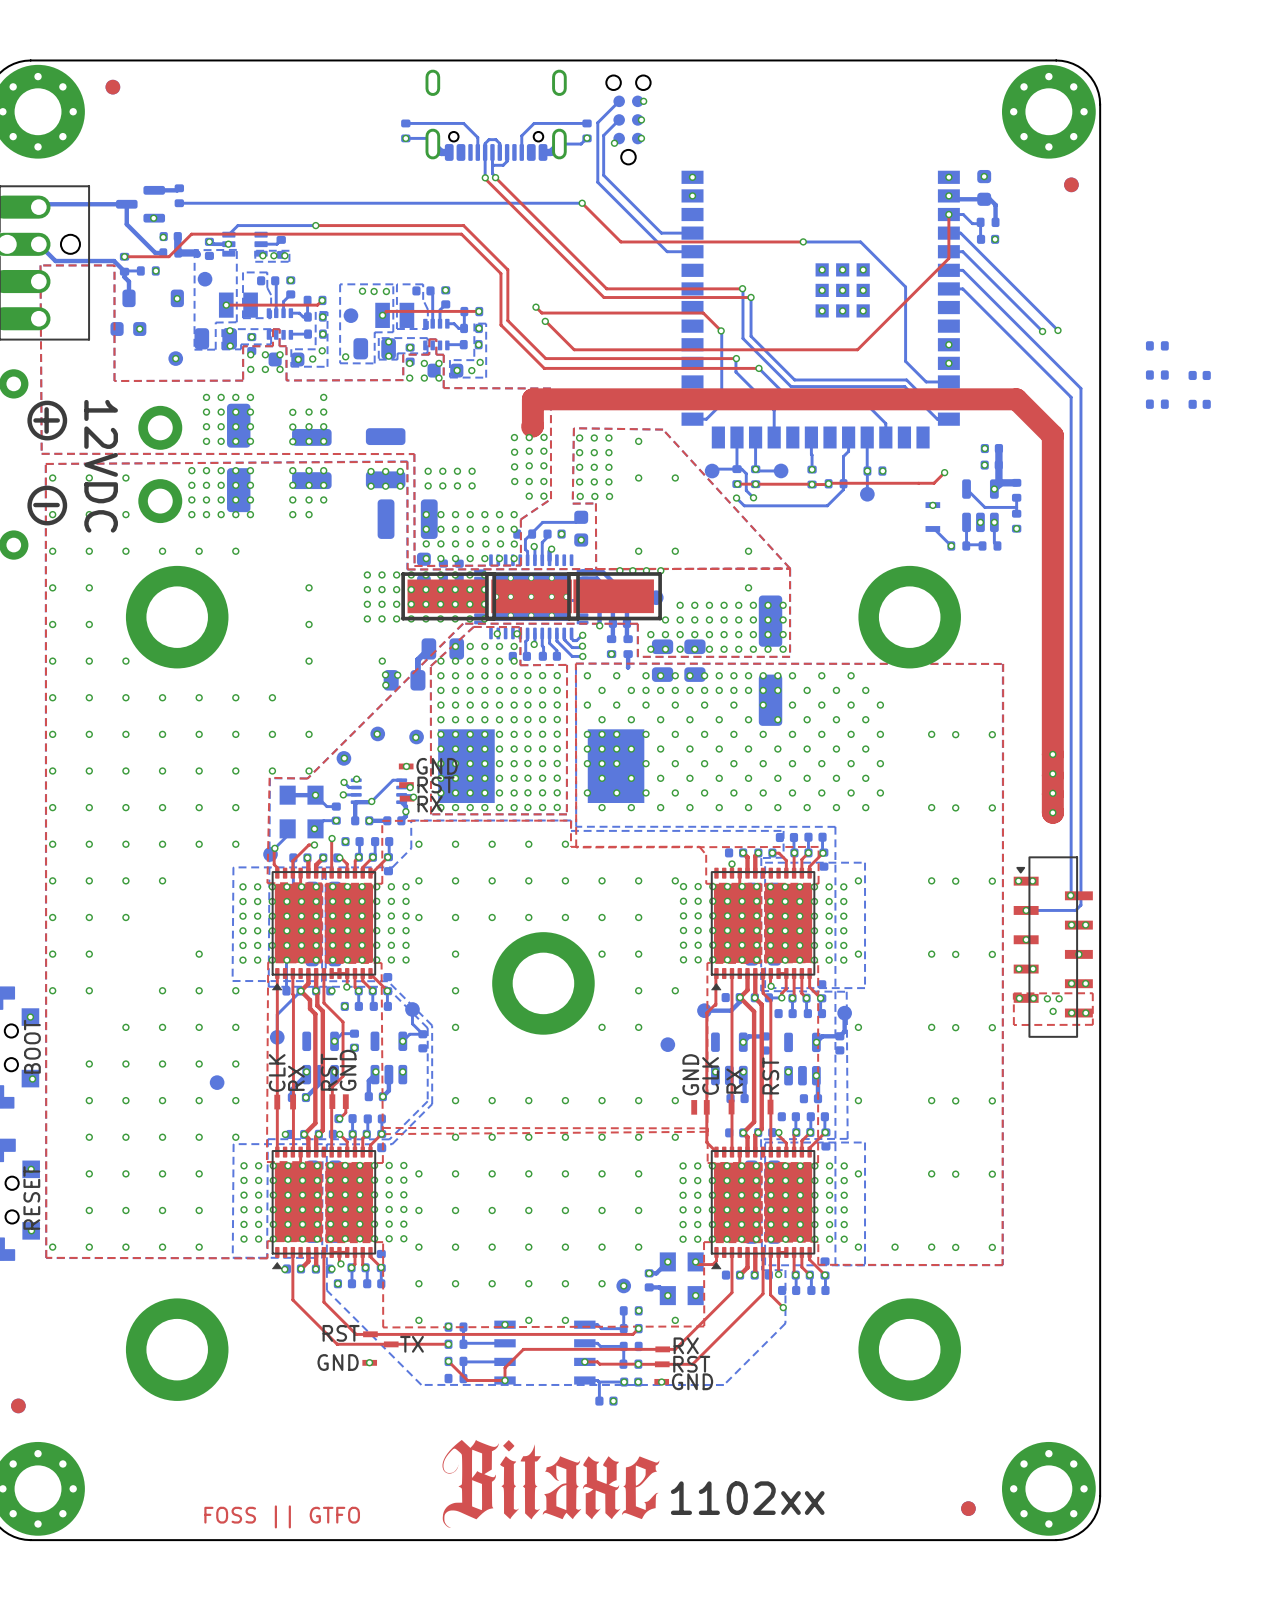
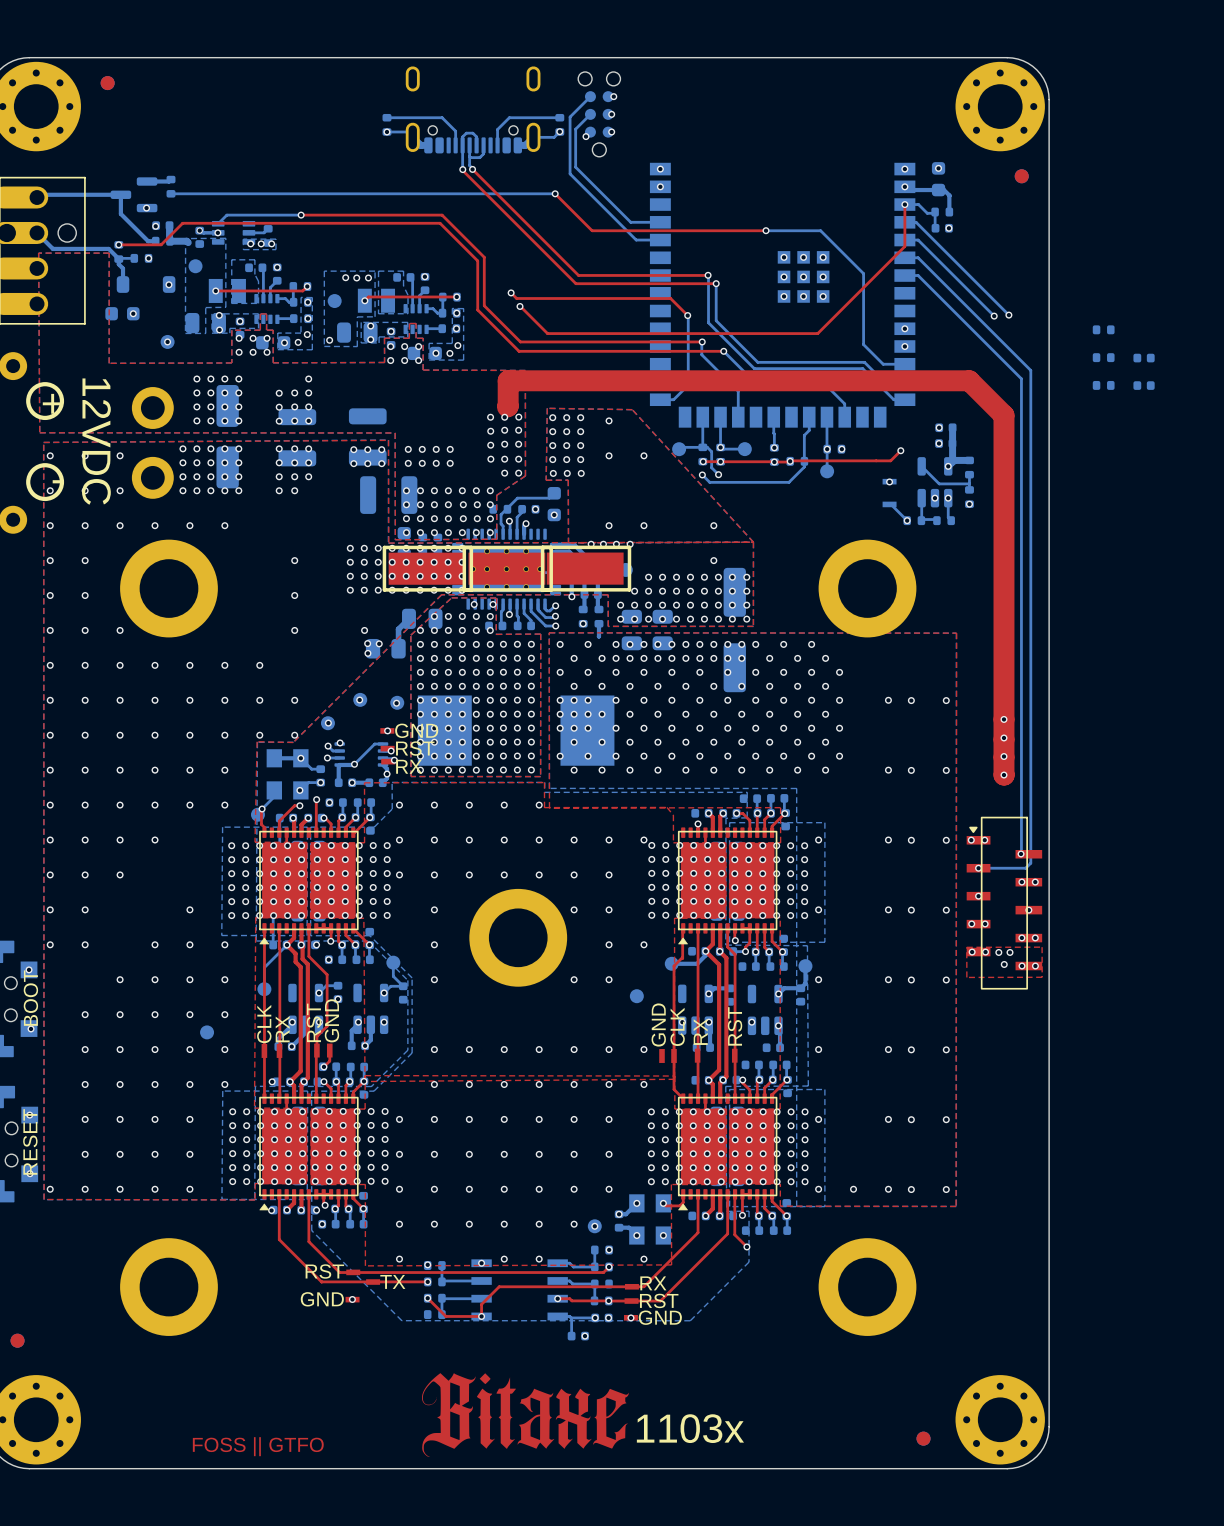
text: 1102xx (747, 1498) -> 1103x (690, 1428)

